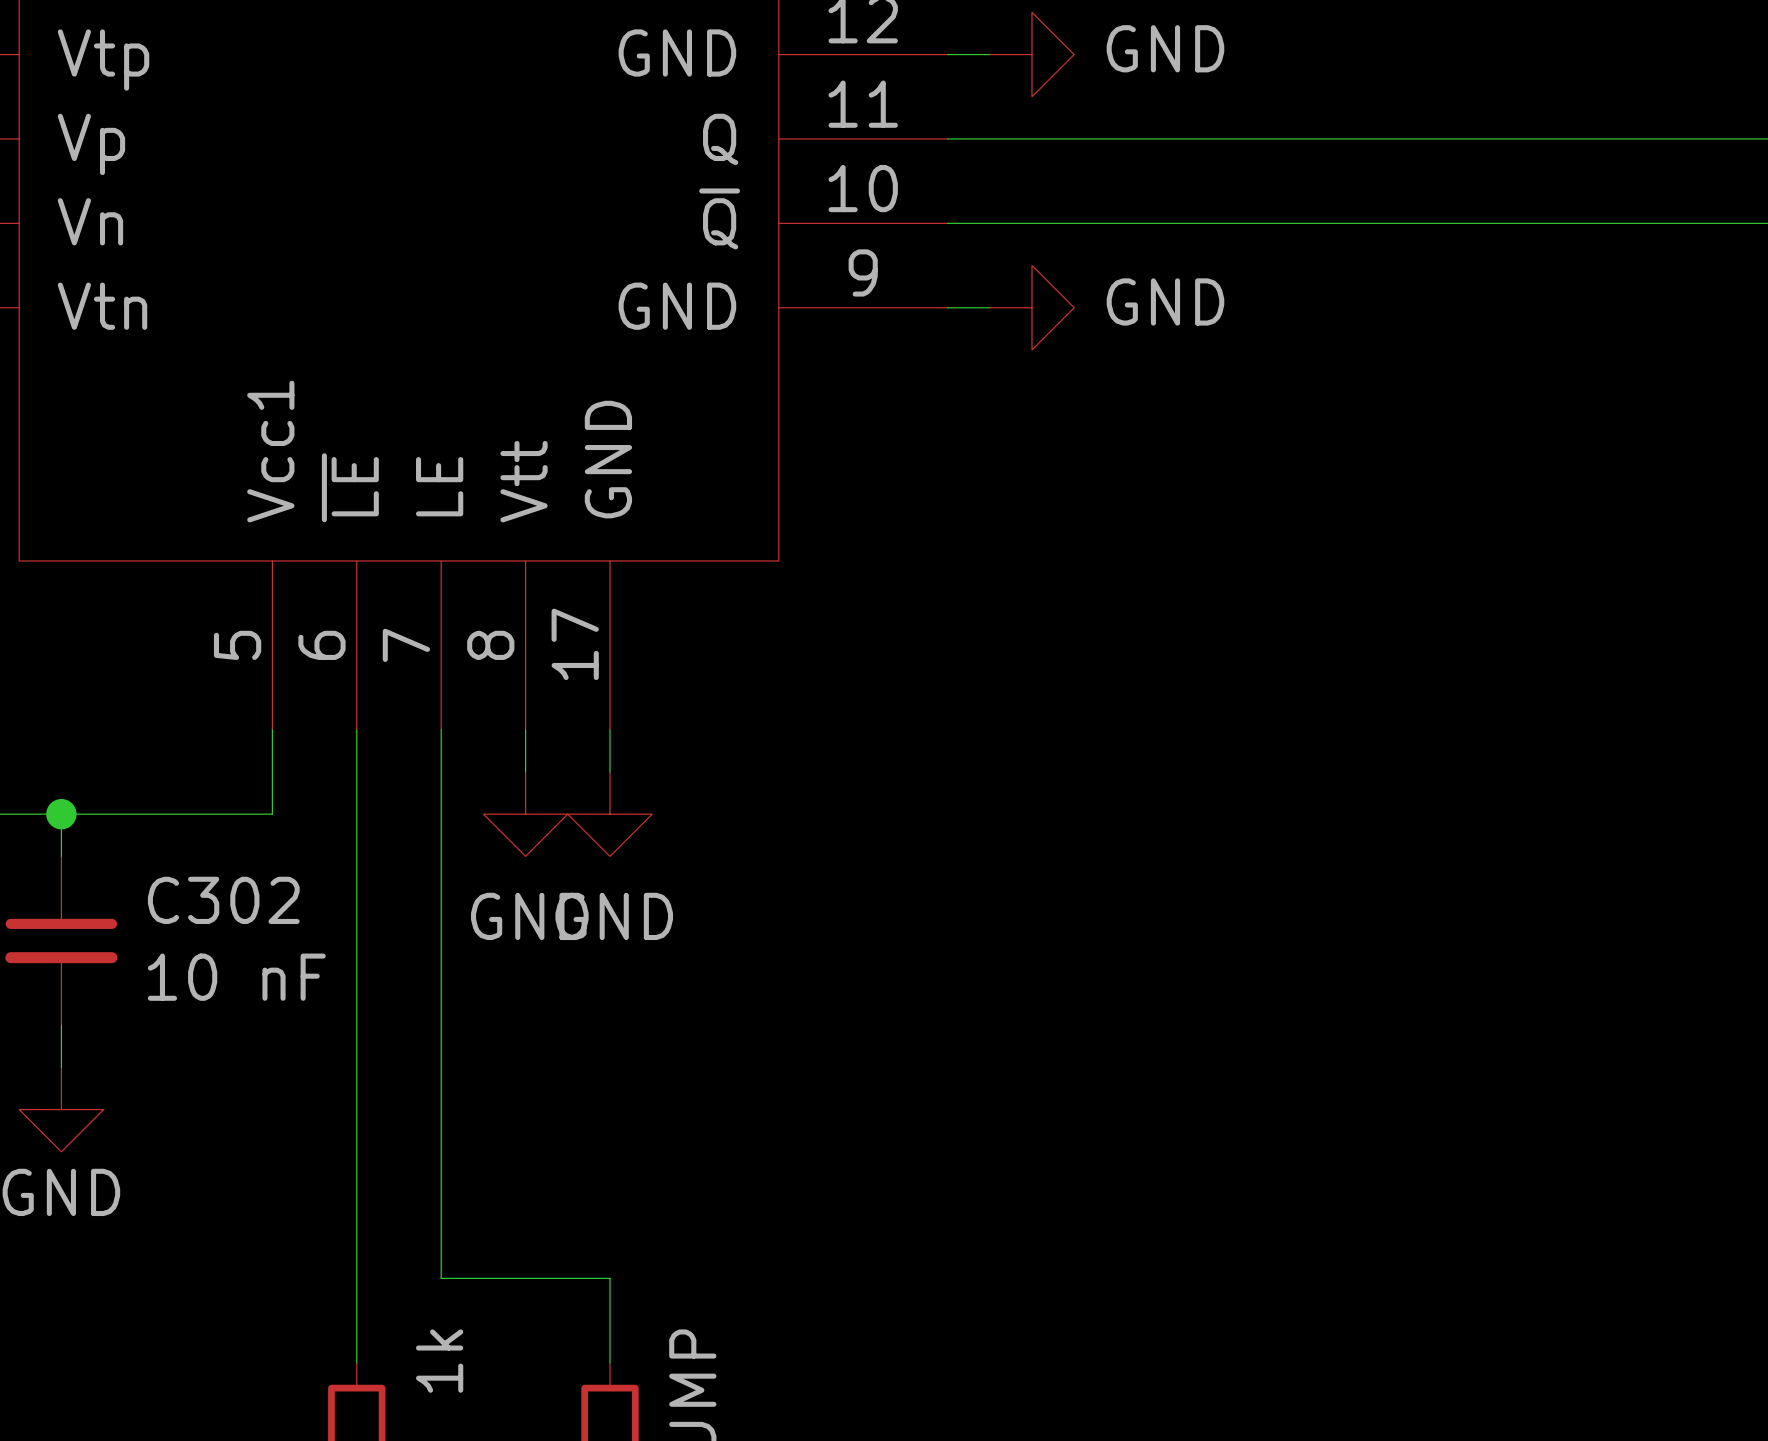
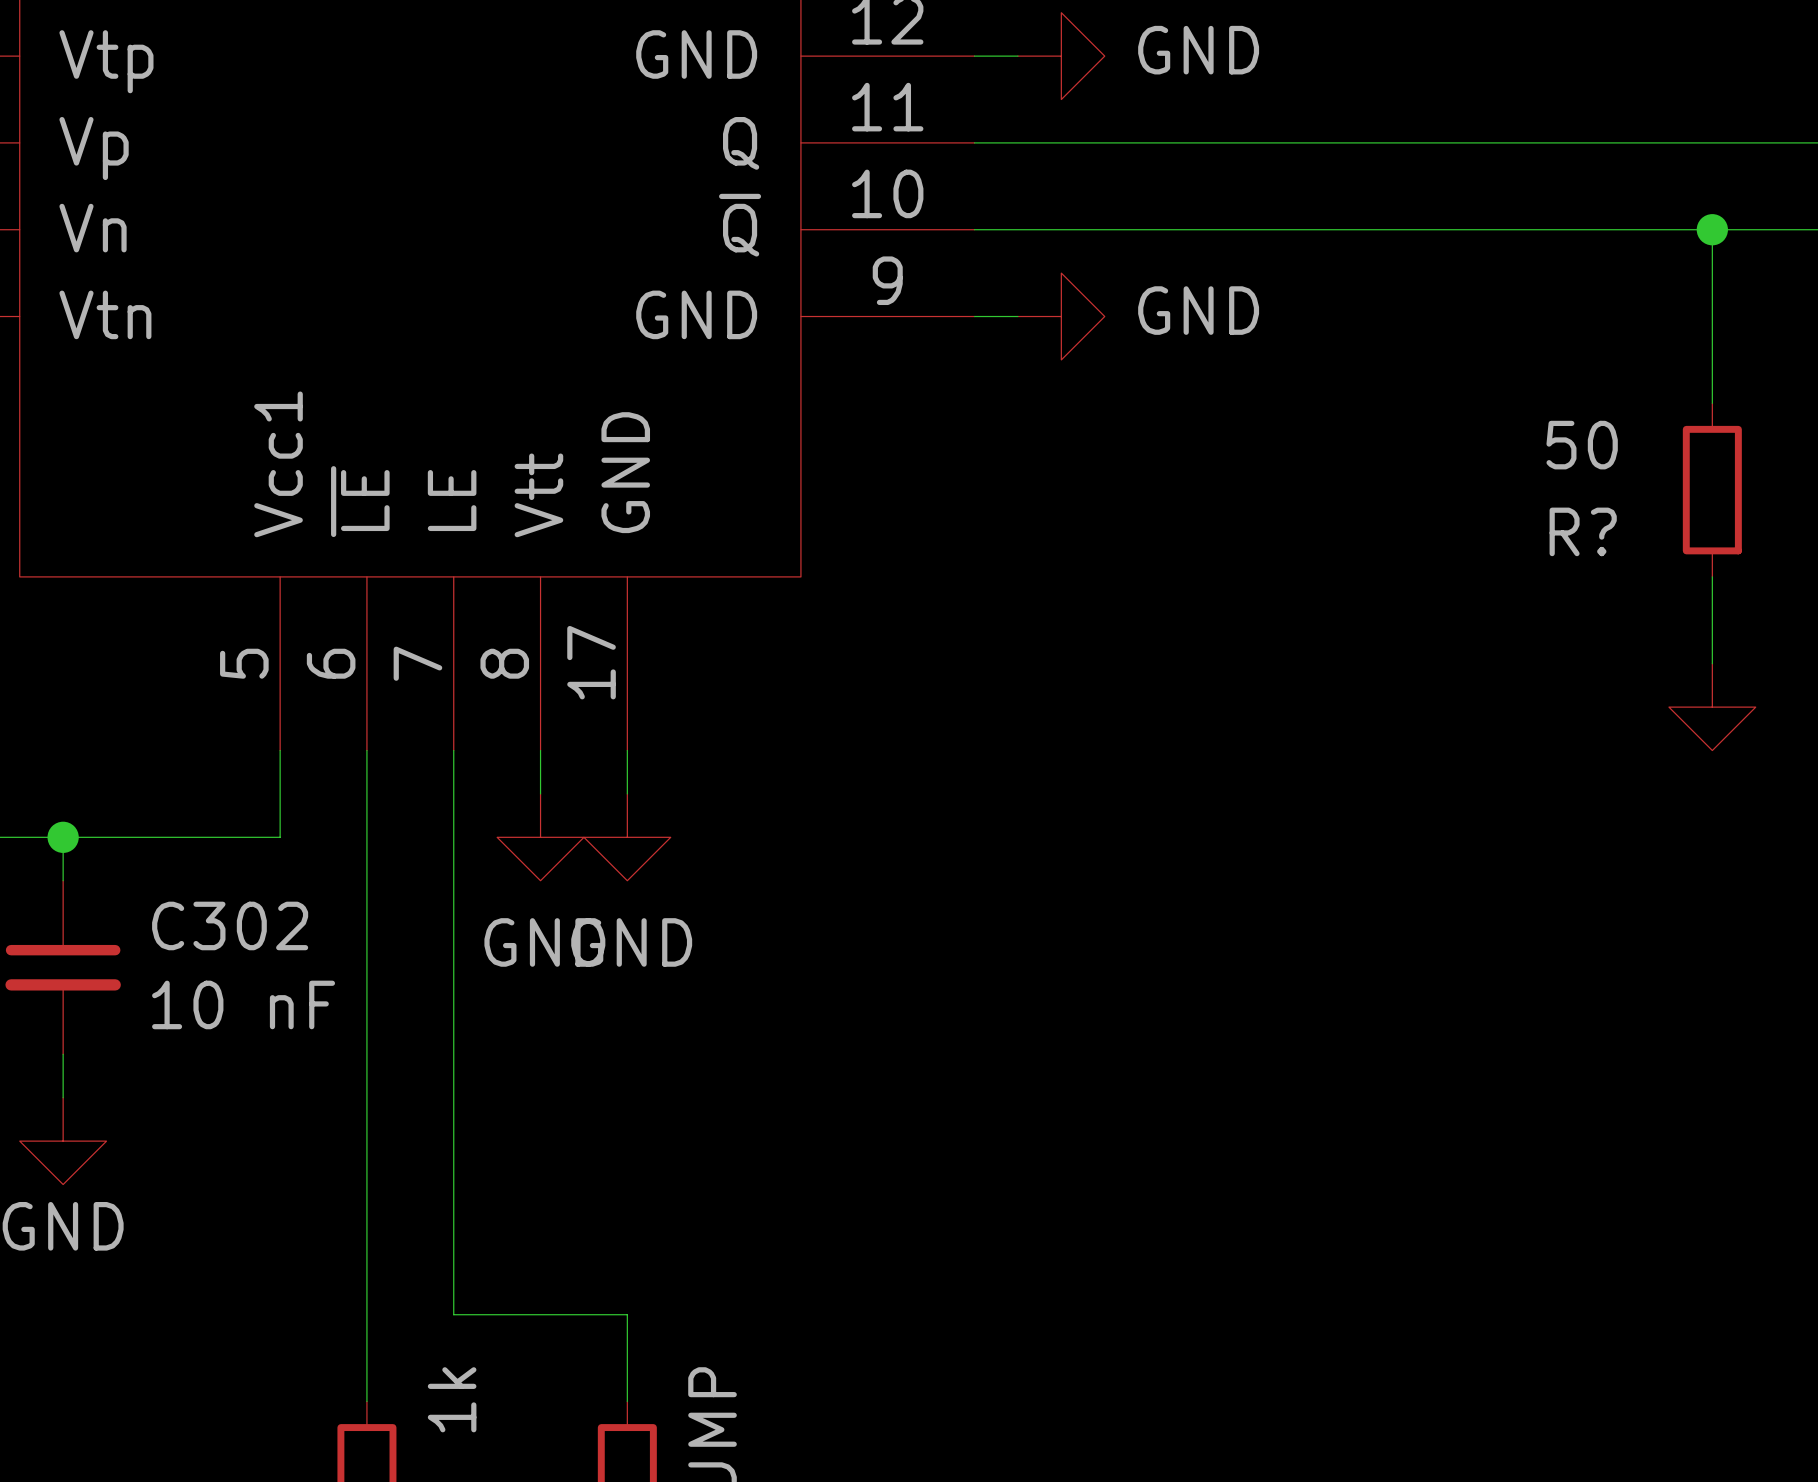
wire: none -> (1712, 229) (1712, 403)
junction: none -> (1712, 229)
R?: none -> 50 (1712, 490)
wire: none -> (1712, 576) (1712, 663)
power symbol: none -> (1712, 707)

